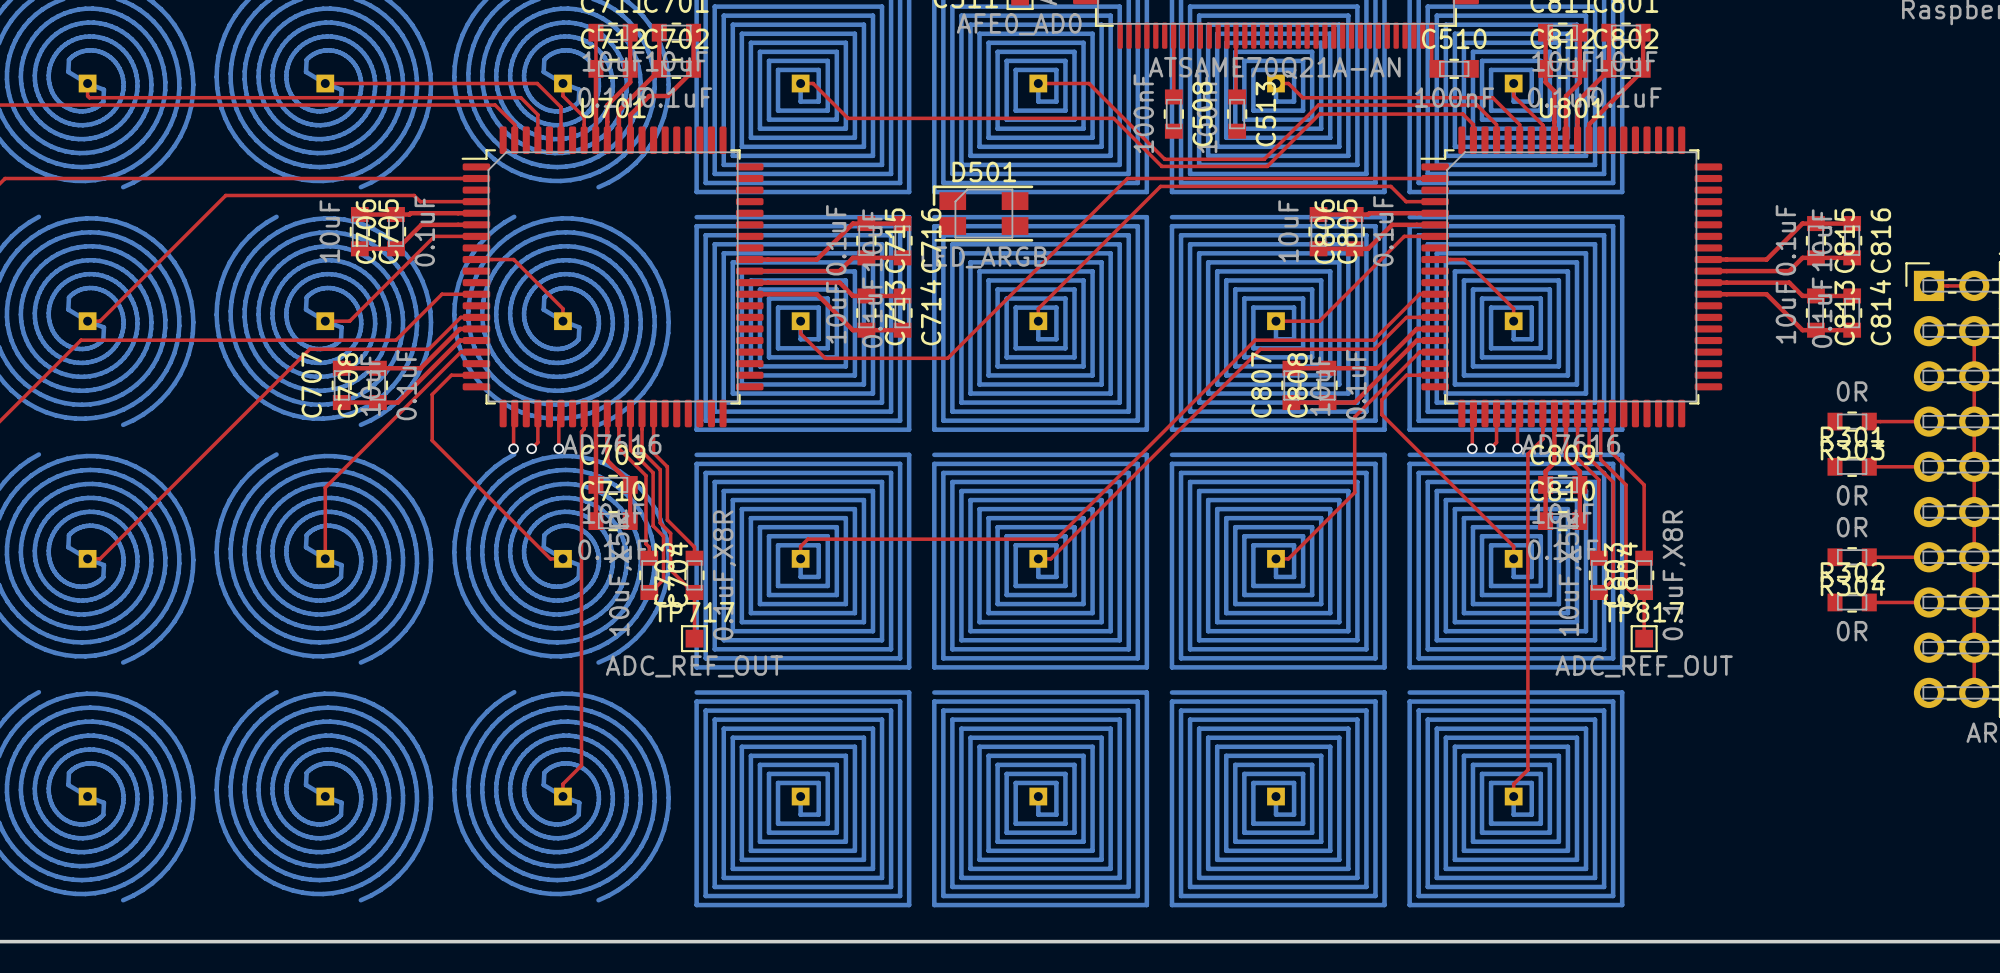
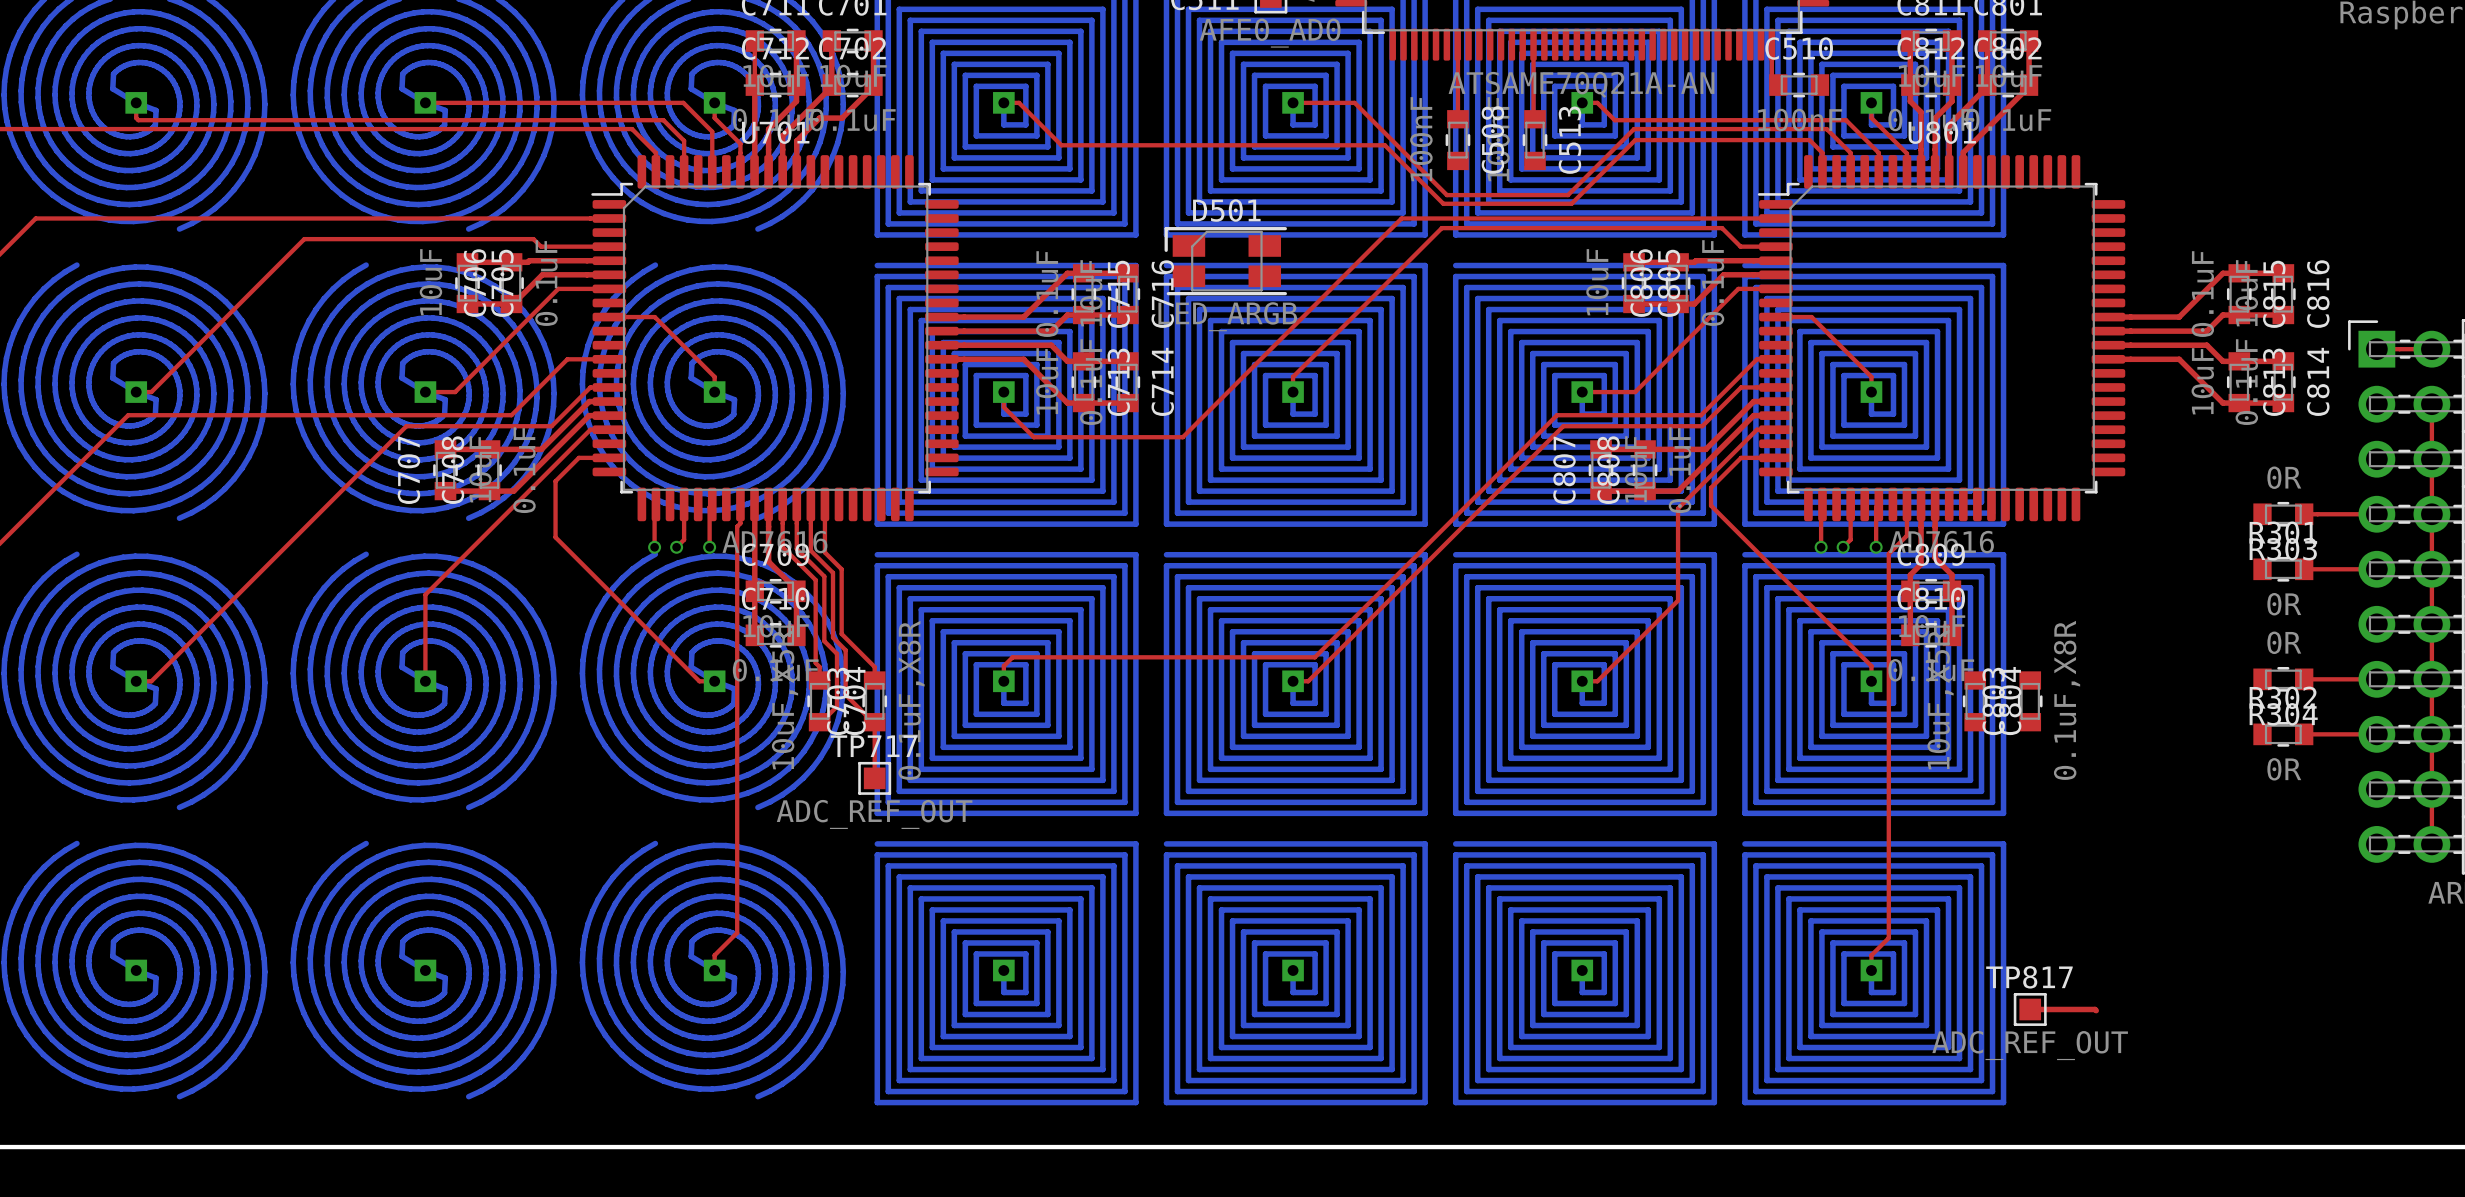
top track: (1577, 413) (1577, 458) (1598, 479) (1598, 558) -> none
top track: (1589, 413) (1589, 458) (1613, 482) (1613, 579) (1598, 592) -> none
top track: (1600, 413) (1600, 459) (1626, 484) (1626, 586) (1631, 592) (1644, 592) (1644, 638) -> none
top track: (1612, 413) (1612, 453) (1644, 484) (1644, 558) -> none
TP817 position: (1644, 638) -> (2030, 1009)
top track: none -> (2030, 1009) (2096, 1010)

